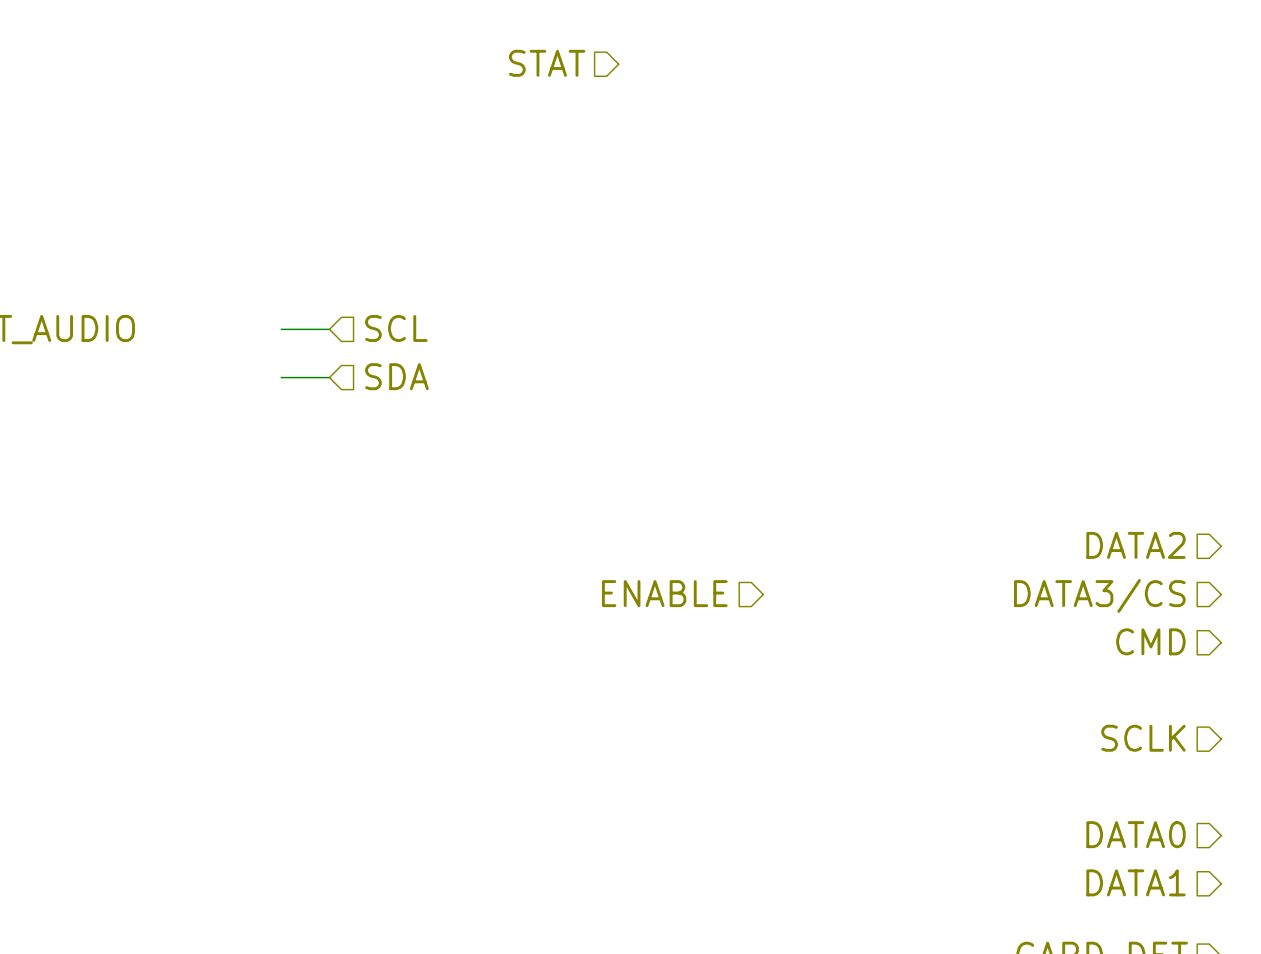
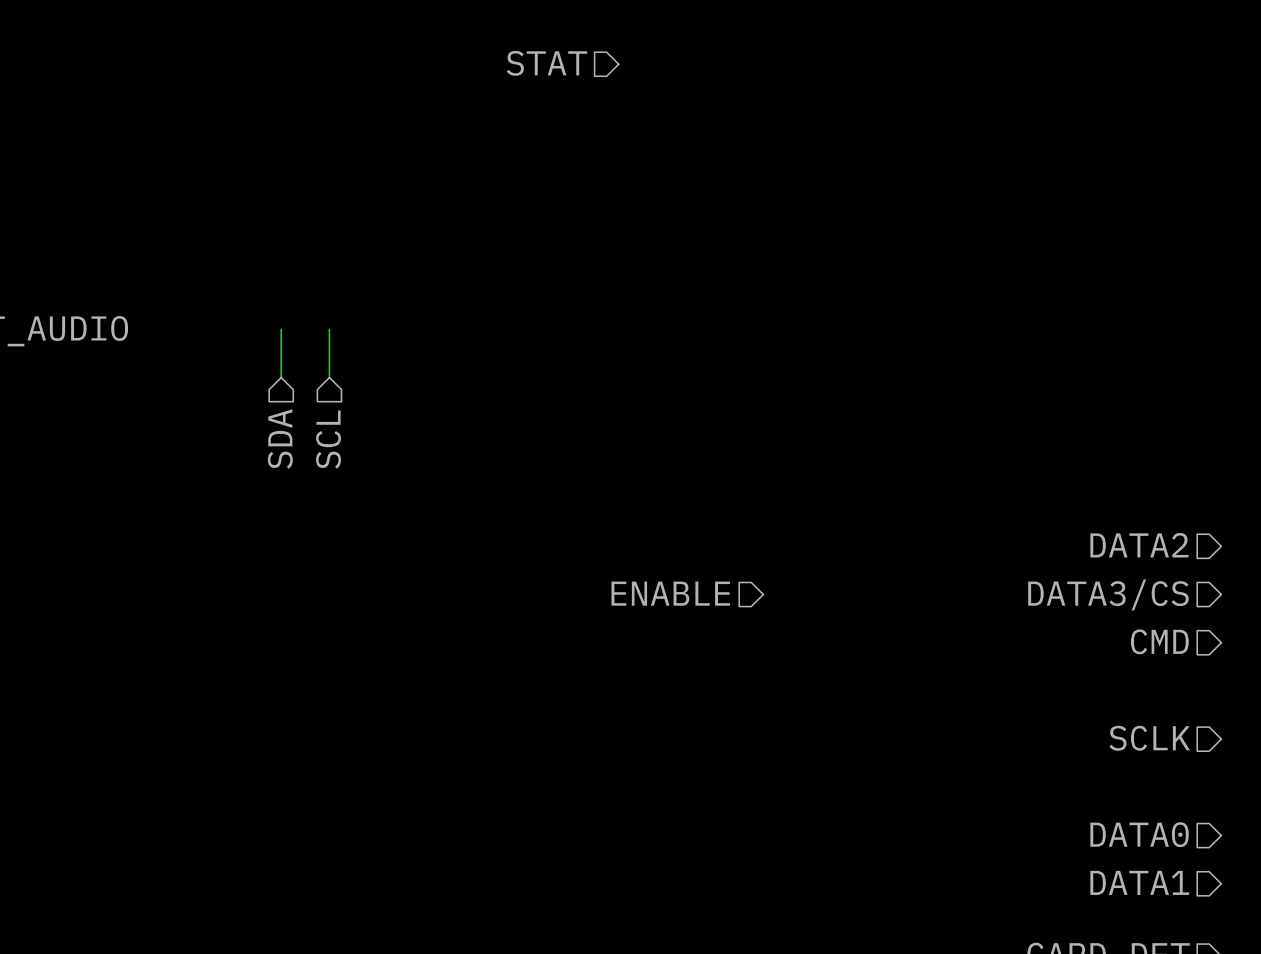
hierarchical label rotation: 0° (396, 328) -> 90° clockwise (328, 439)
hierarchical label position: SCL (396, 328) -> SCL (328, 439)
wire: (281, 329) (329, 329) -> (281, 329) (281, 377)
hierarchical label rotation: 0° (396, 376) -> 90° clockwise (280, 439)
hierarchical label position: SDA (396, 376) -> SDA (280, 439)
wire: (281, 377) (329, 377) -> (329, 329) (329, 377)

